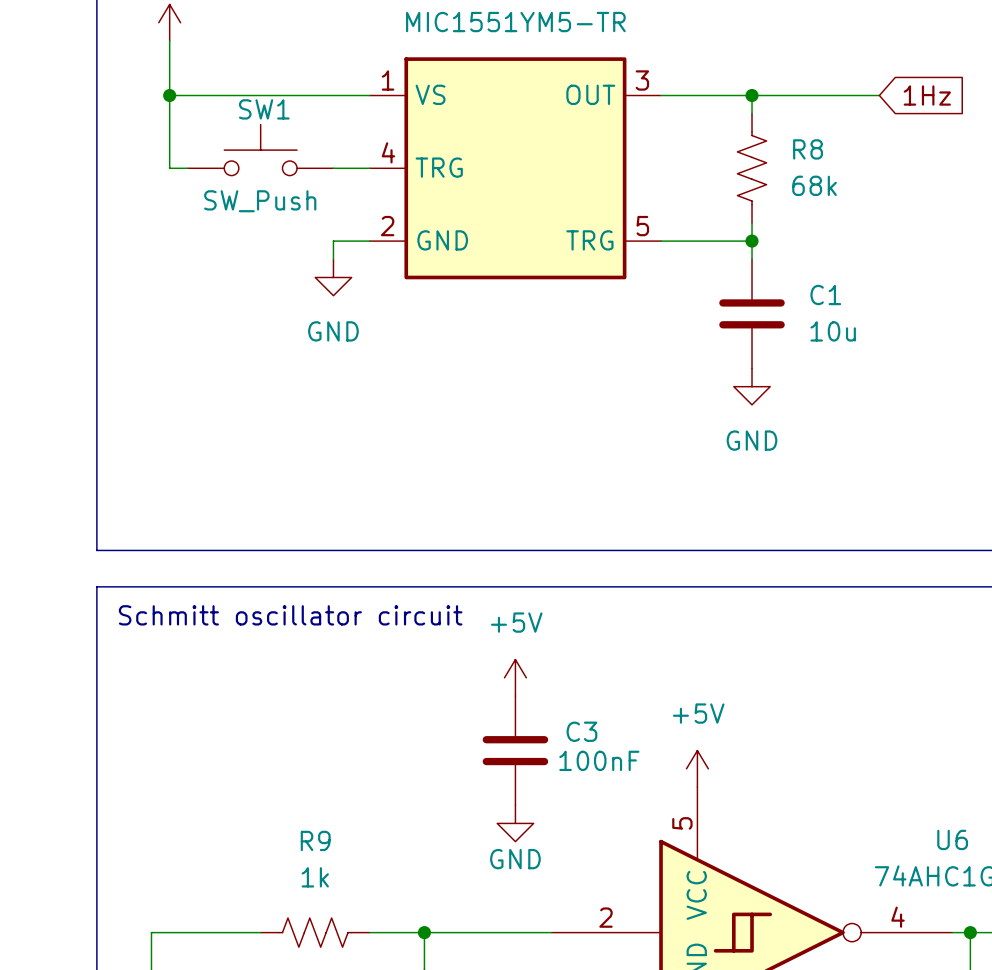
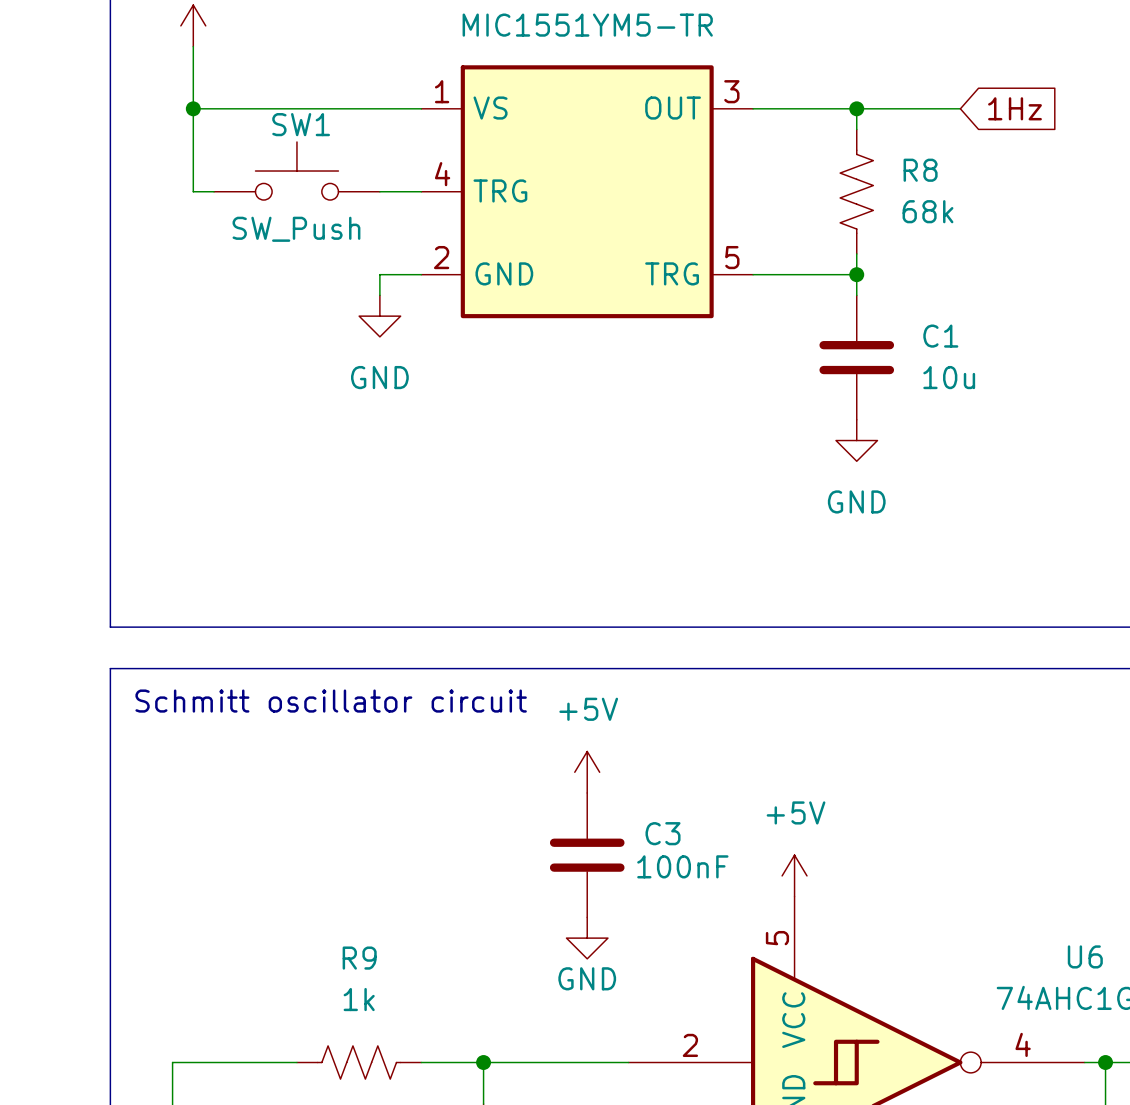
wire: (842, 95) (879, 95) -> none
global label position: 1Hz (927, 95) -> 1Hz (1014, 108)

